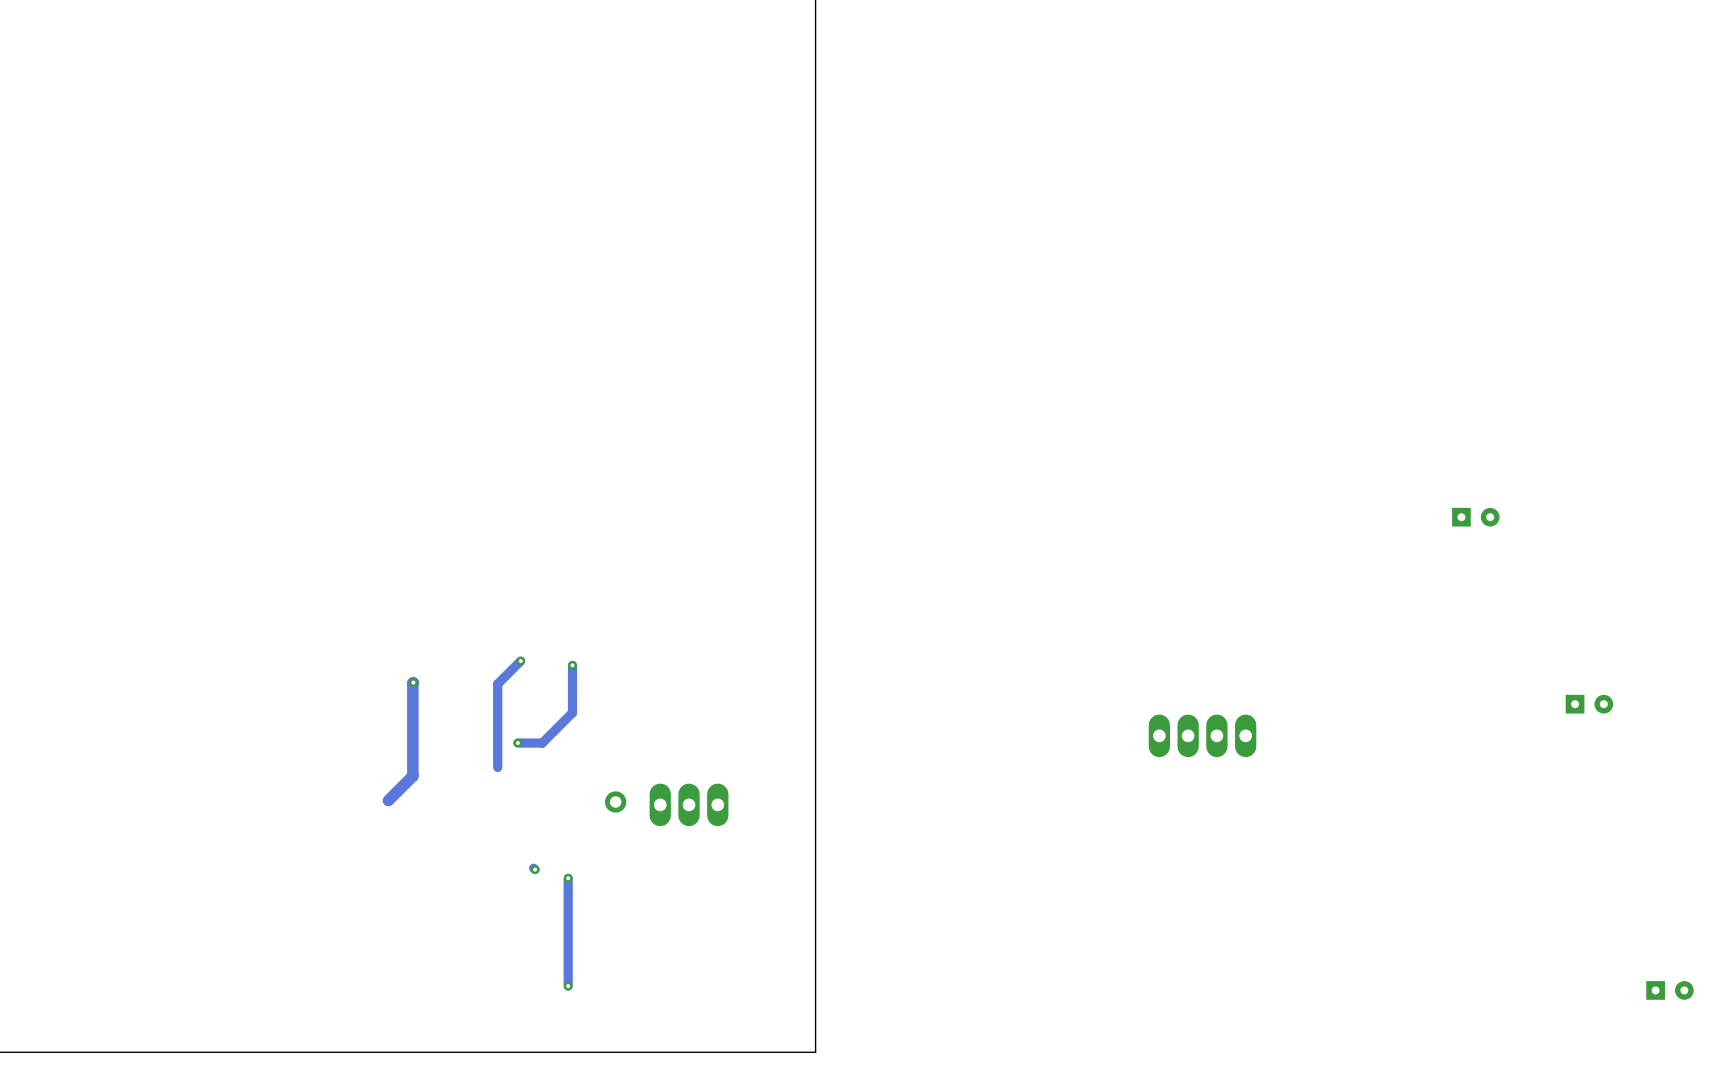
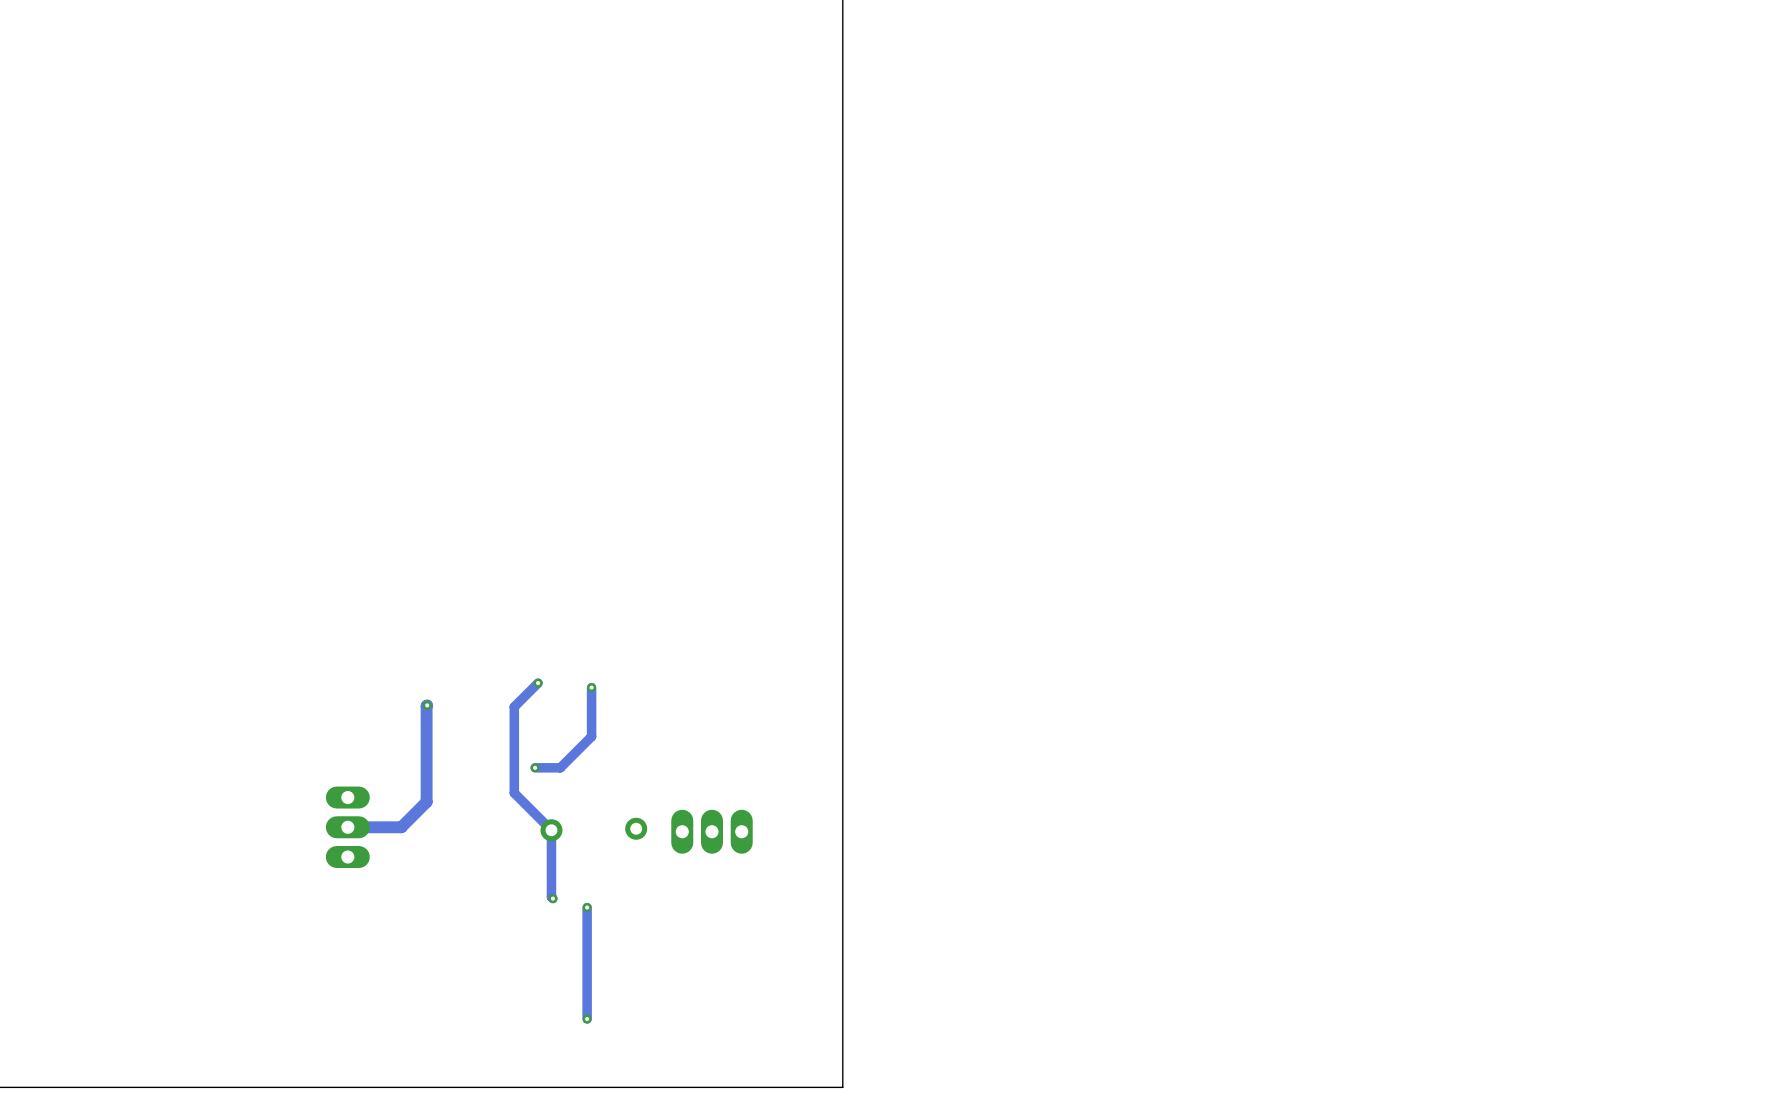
part: (1475, 517) -> none
part: (1589, 704) -> none
part: (1202, 735) -> none
track: none -> (514, 793) (551, 830) (551, 897)
part: none -> (347, 827)
track: none -> (401, 827) (347, 827)
part: none -> (551, 830)
part: (1669, 990) -> none

